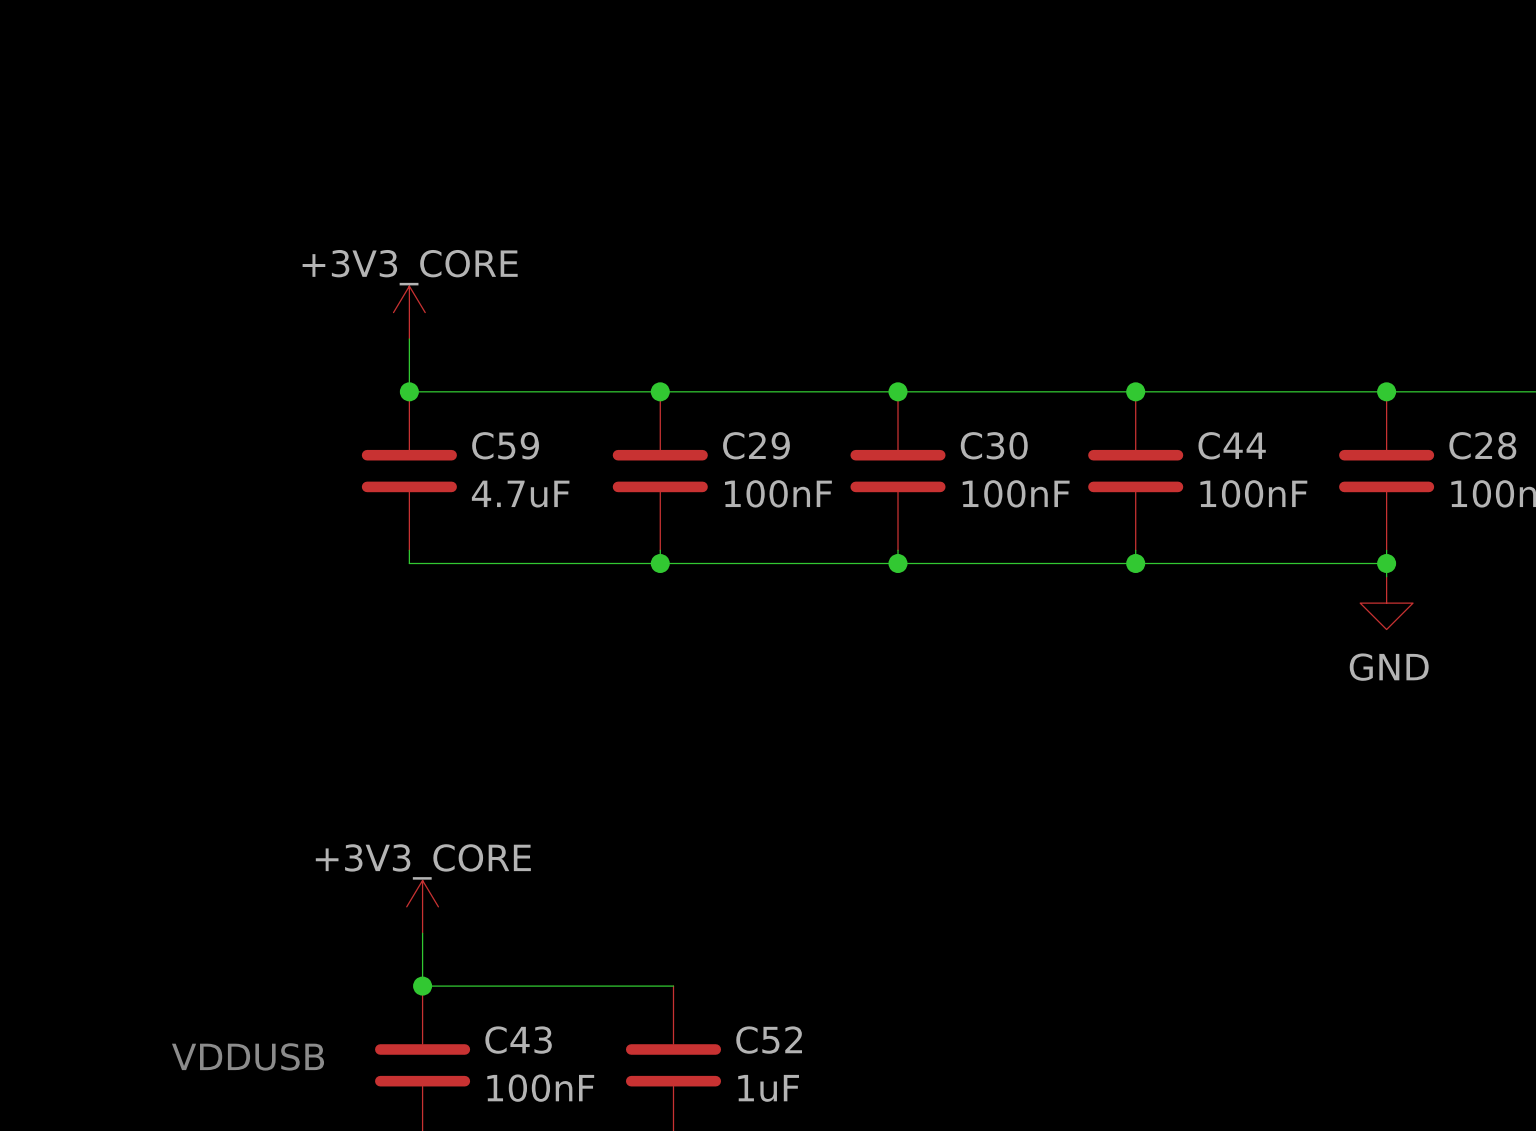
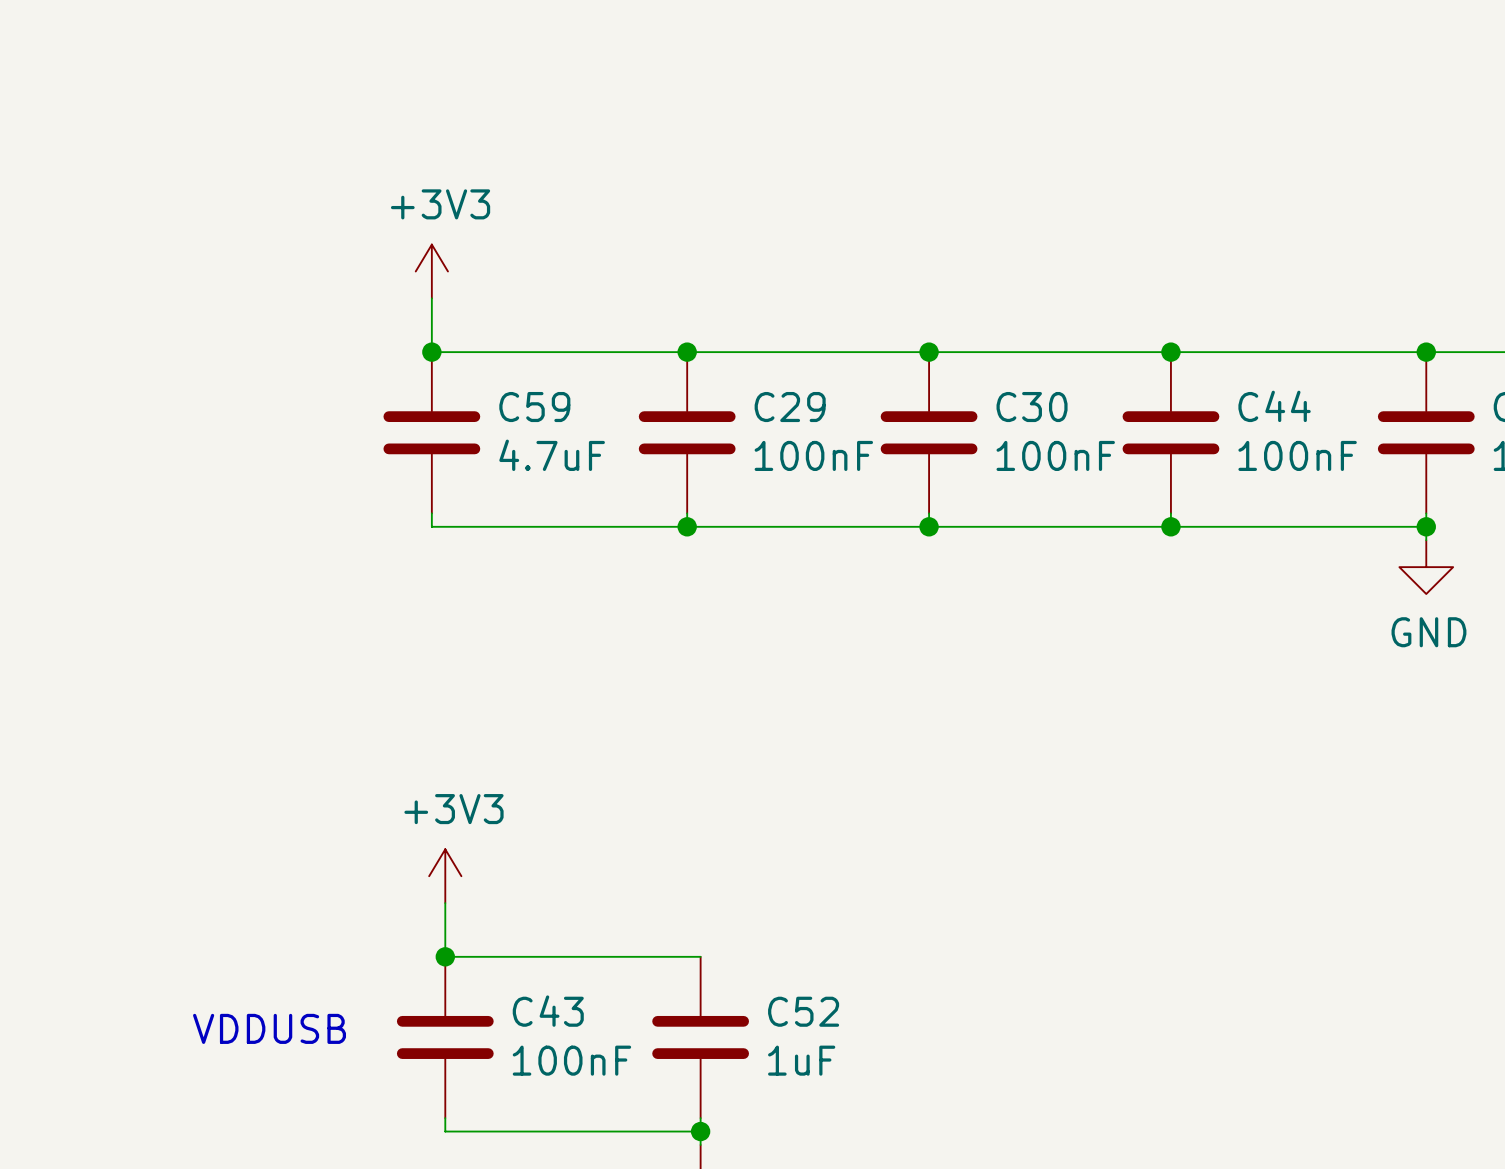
power symbol: +3V3_CORE (409, 312) -> +3V3 (431, 271)
power symbol: +3V3_CORE (422, 906) -> +3V3 (445, 876)

